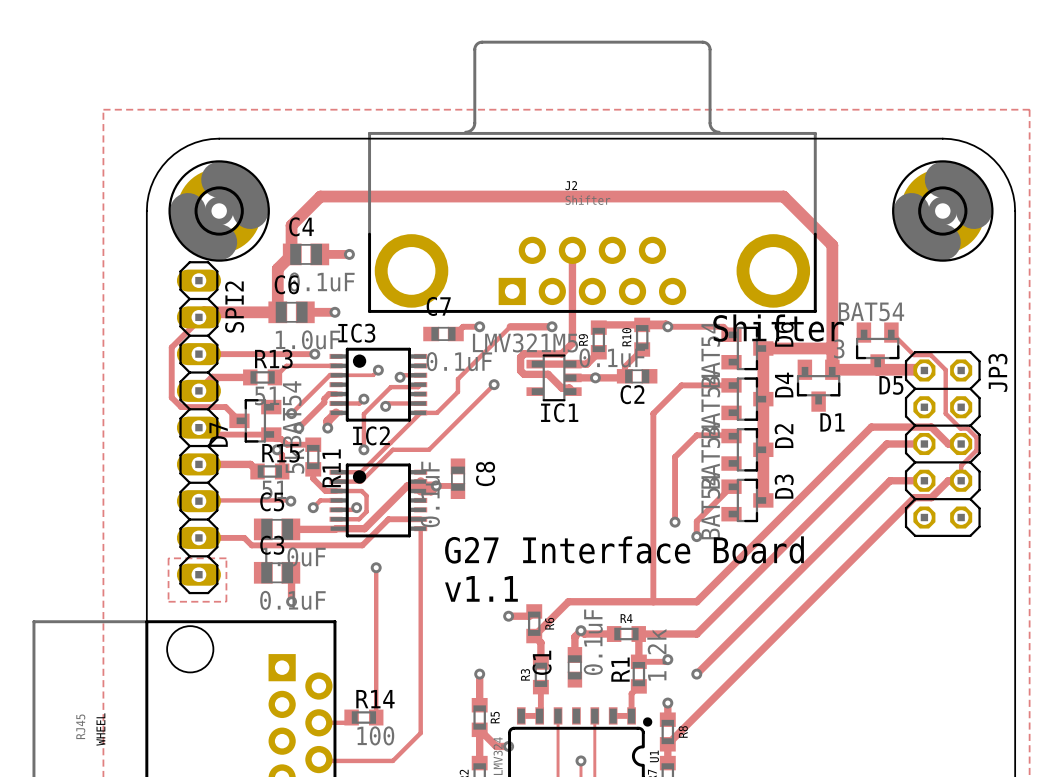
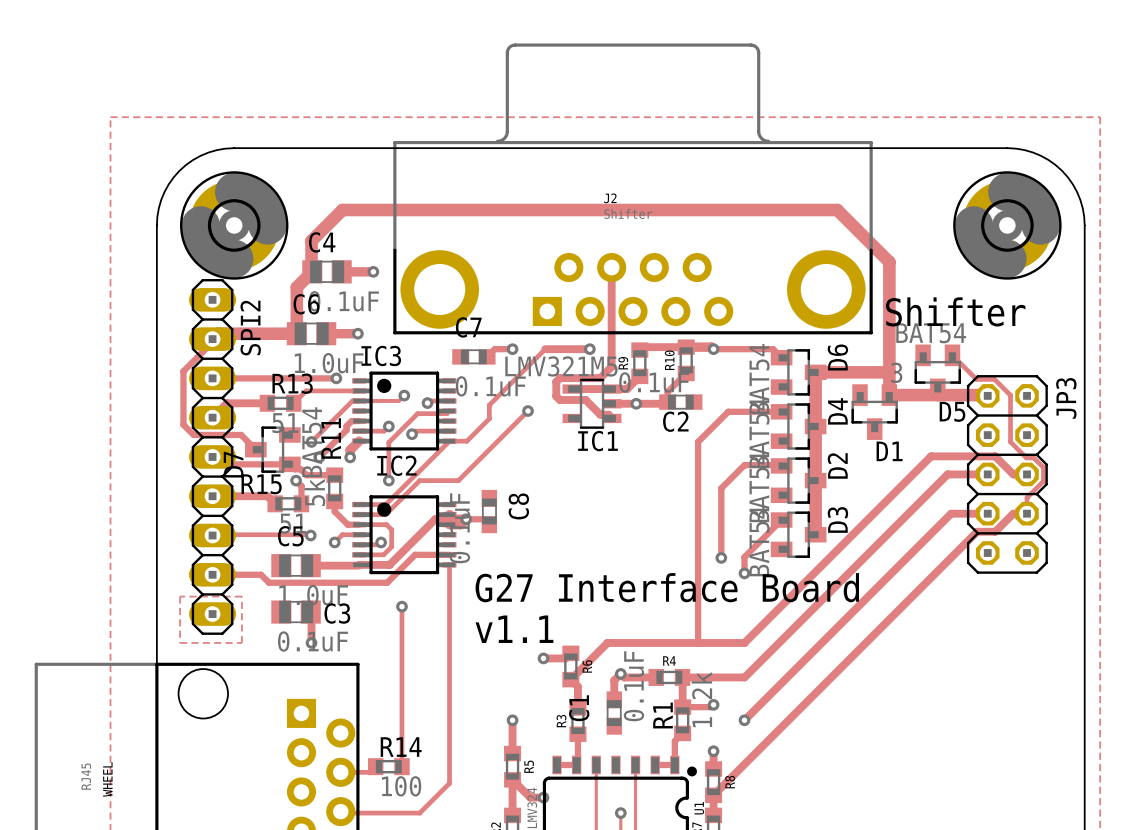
text position: Shifter (778, 328) -> Shifter (955, 311)
R15 name position: R15 (281, 453) -> R15 (261, 484)
R11 name position: R11 (331, 468) -> R11 (331, 438)
C3 name position: C3 (272, 545) -> C3 (337, 613)

